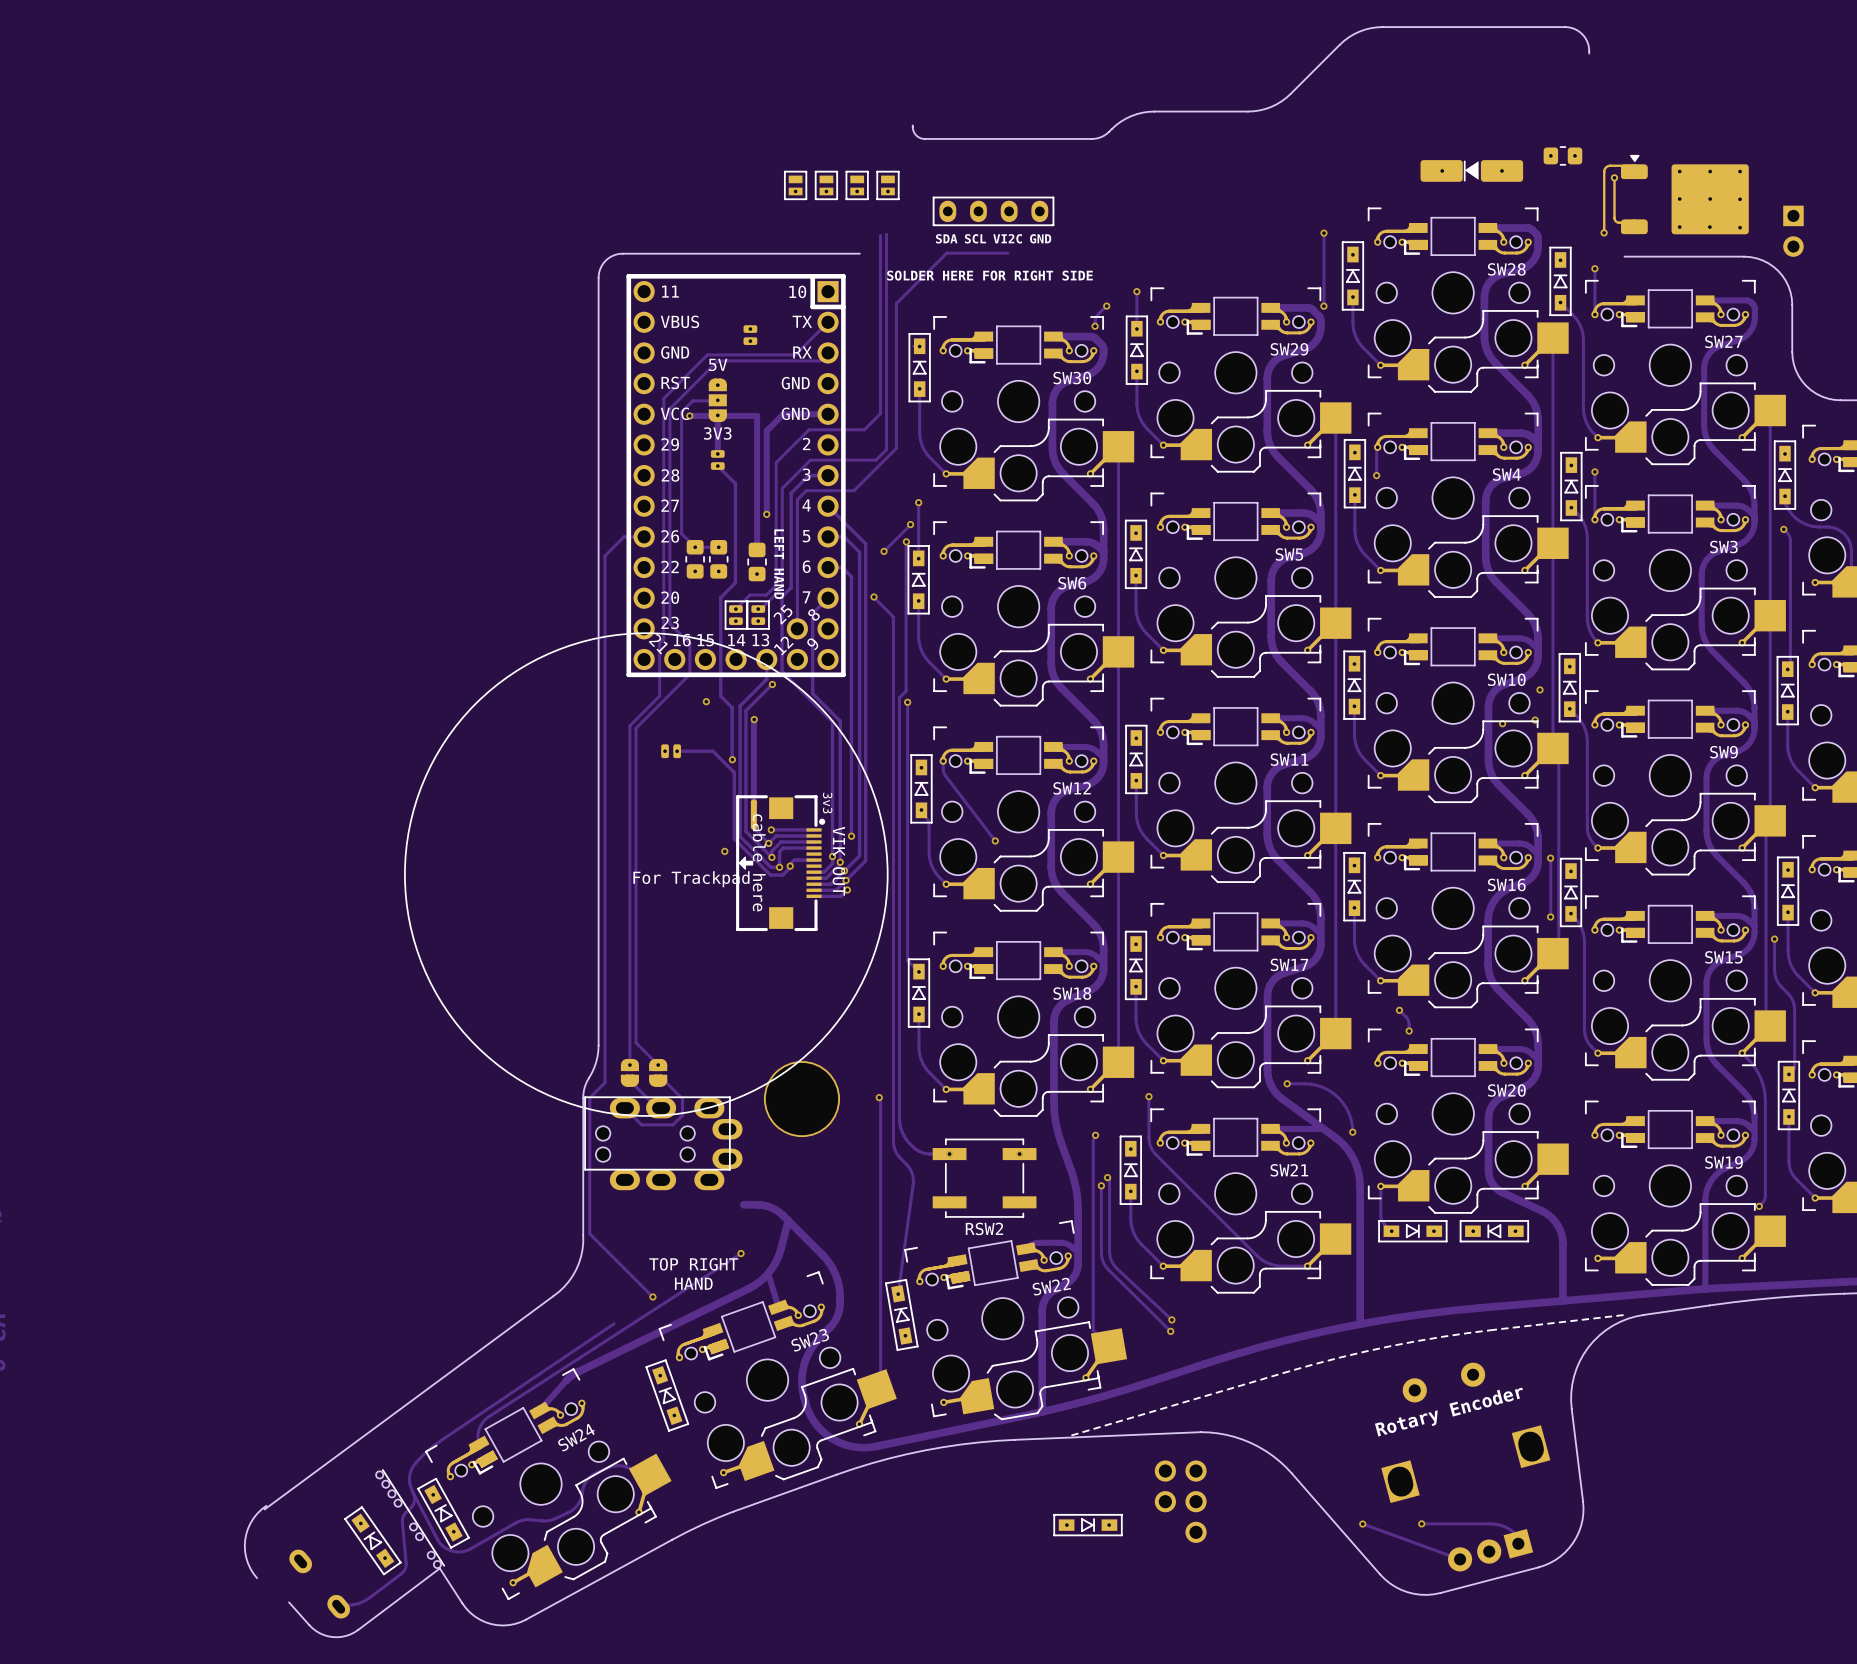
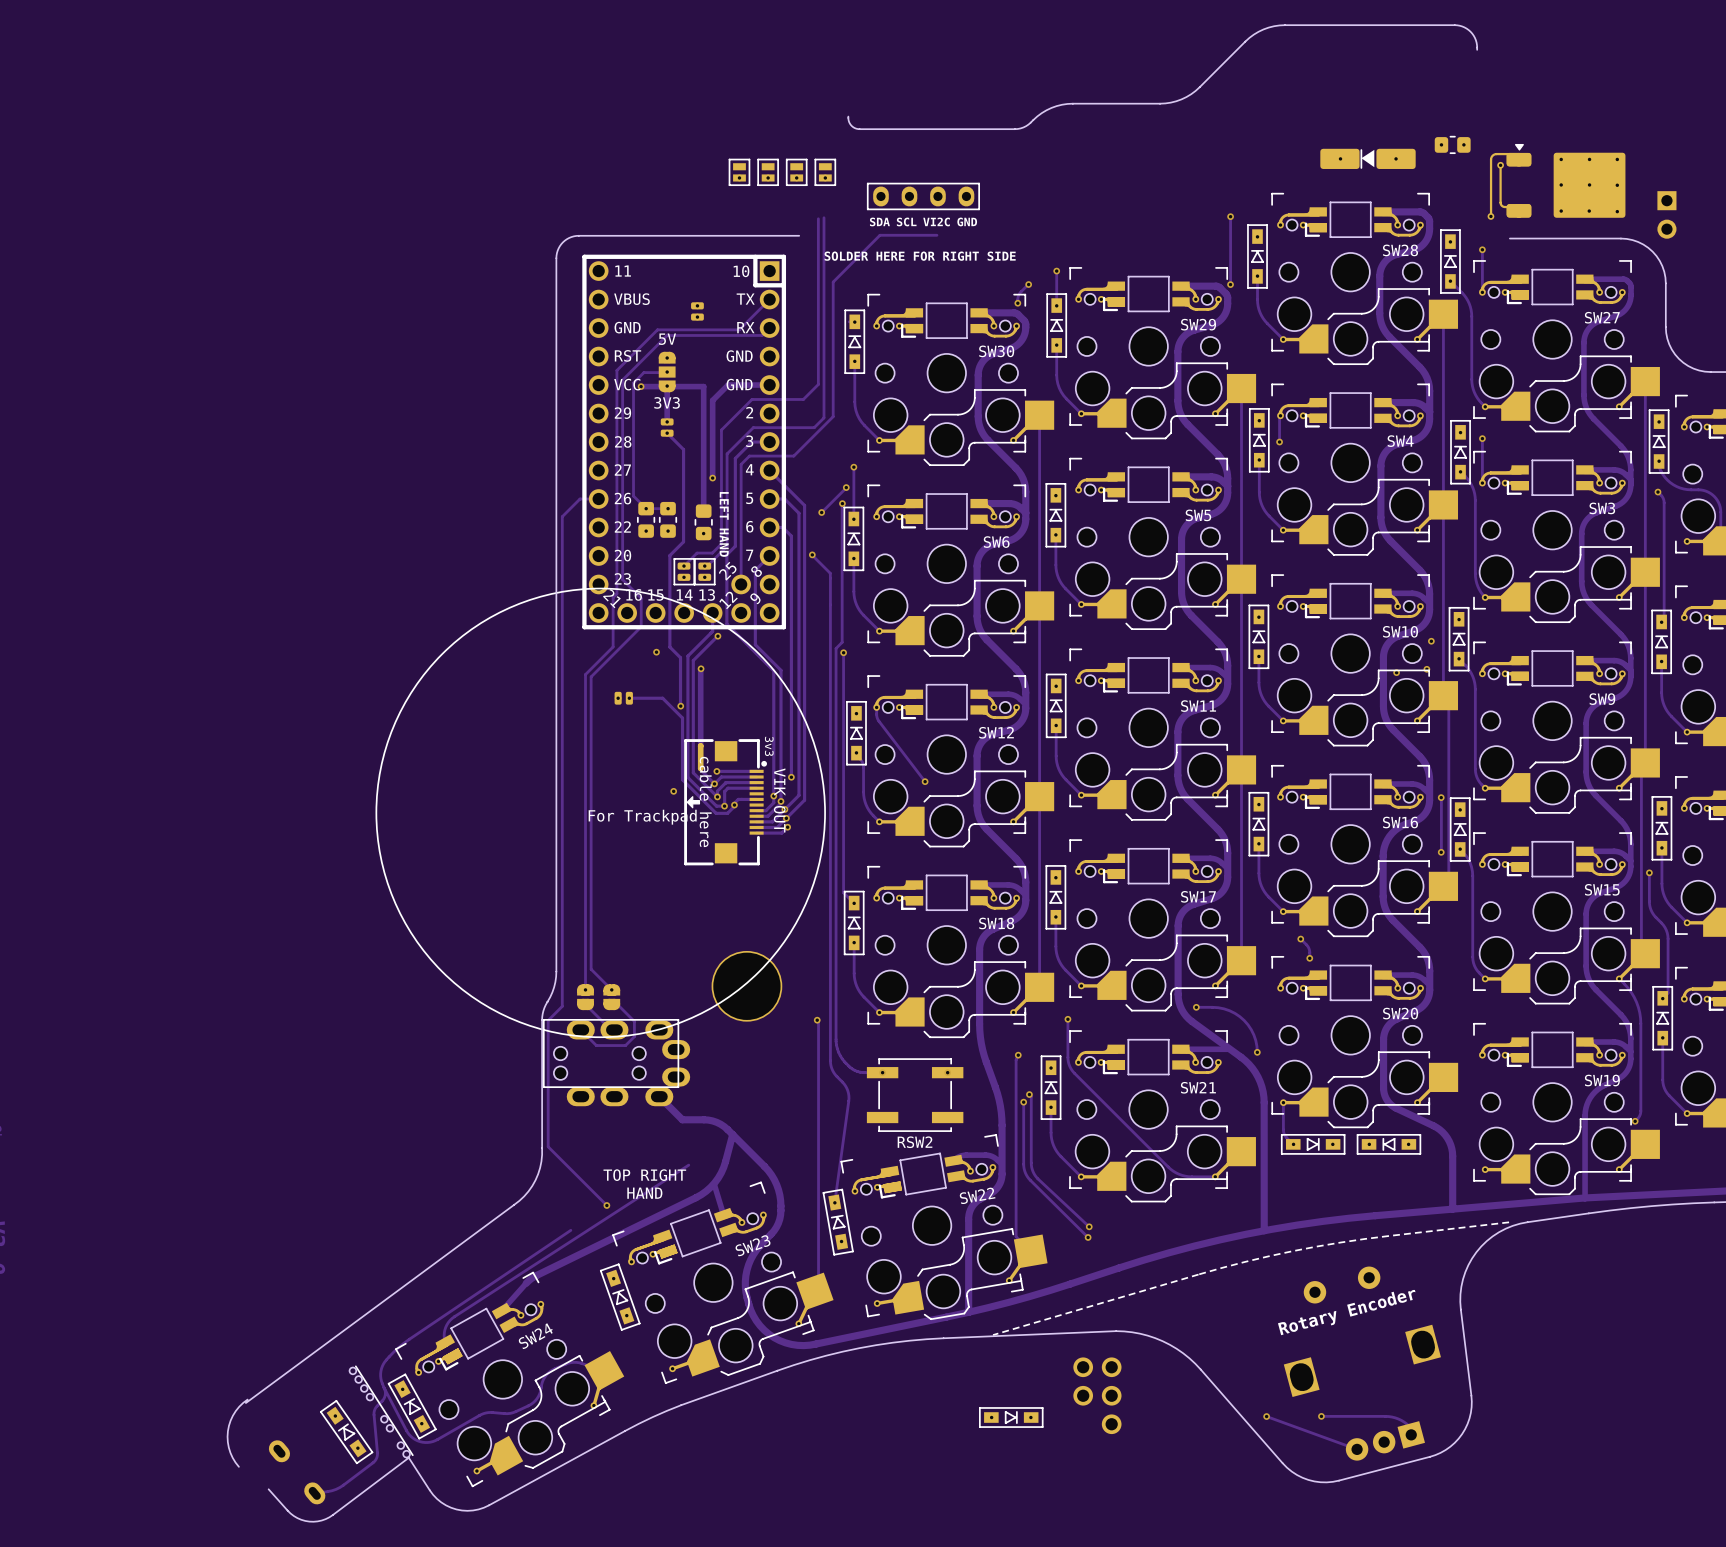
part position: (801, 1099) -> (746, 986)
track: none -> (659, 1096) (682, 1119) (691, 1119)
via: (741, 1253) -> none

